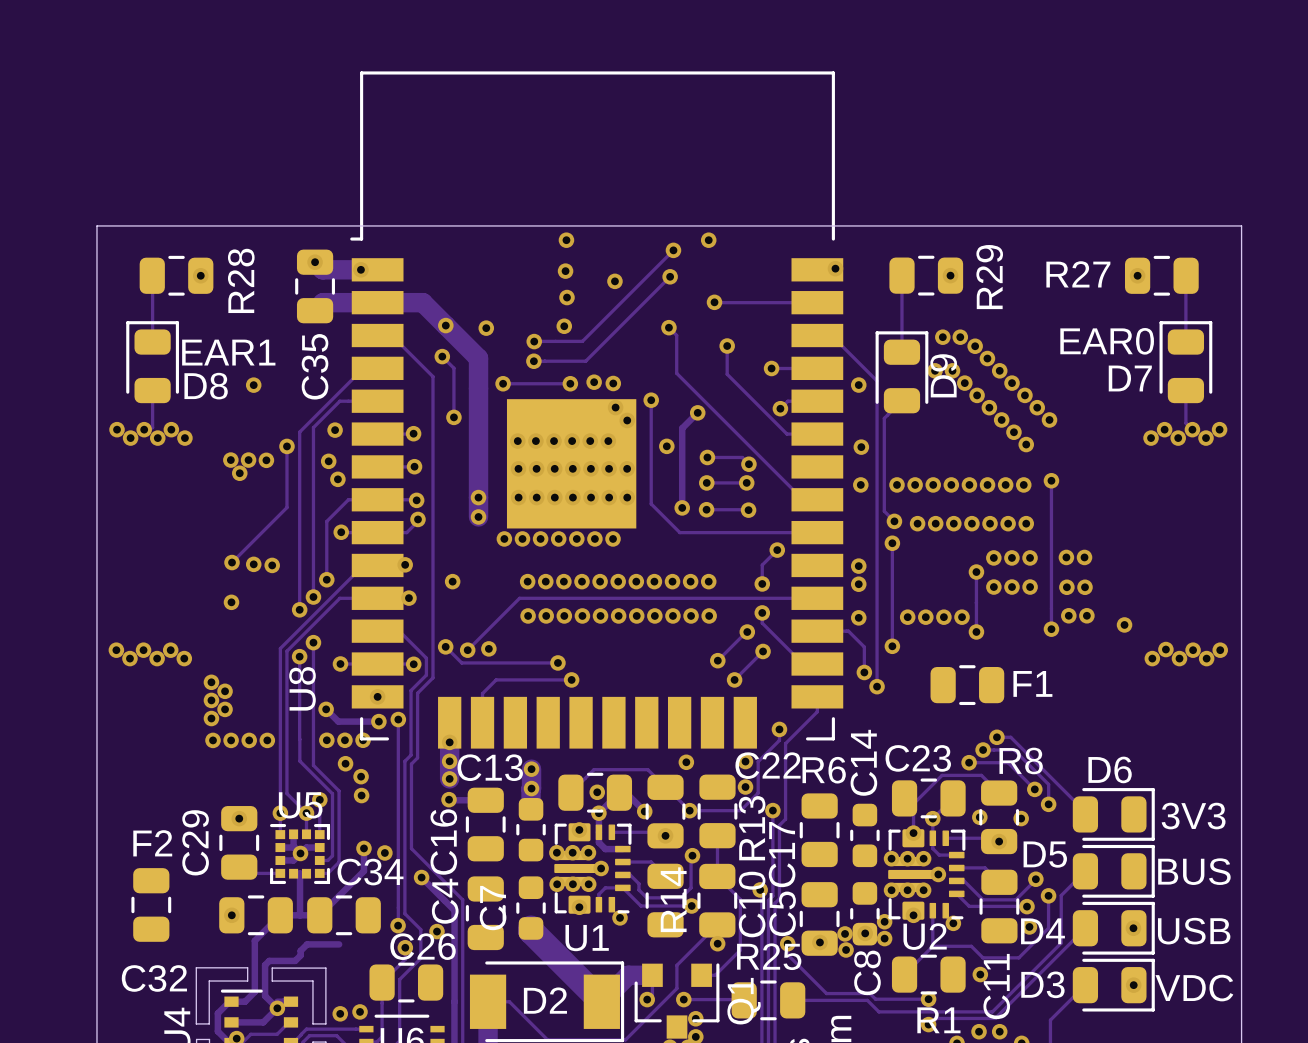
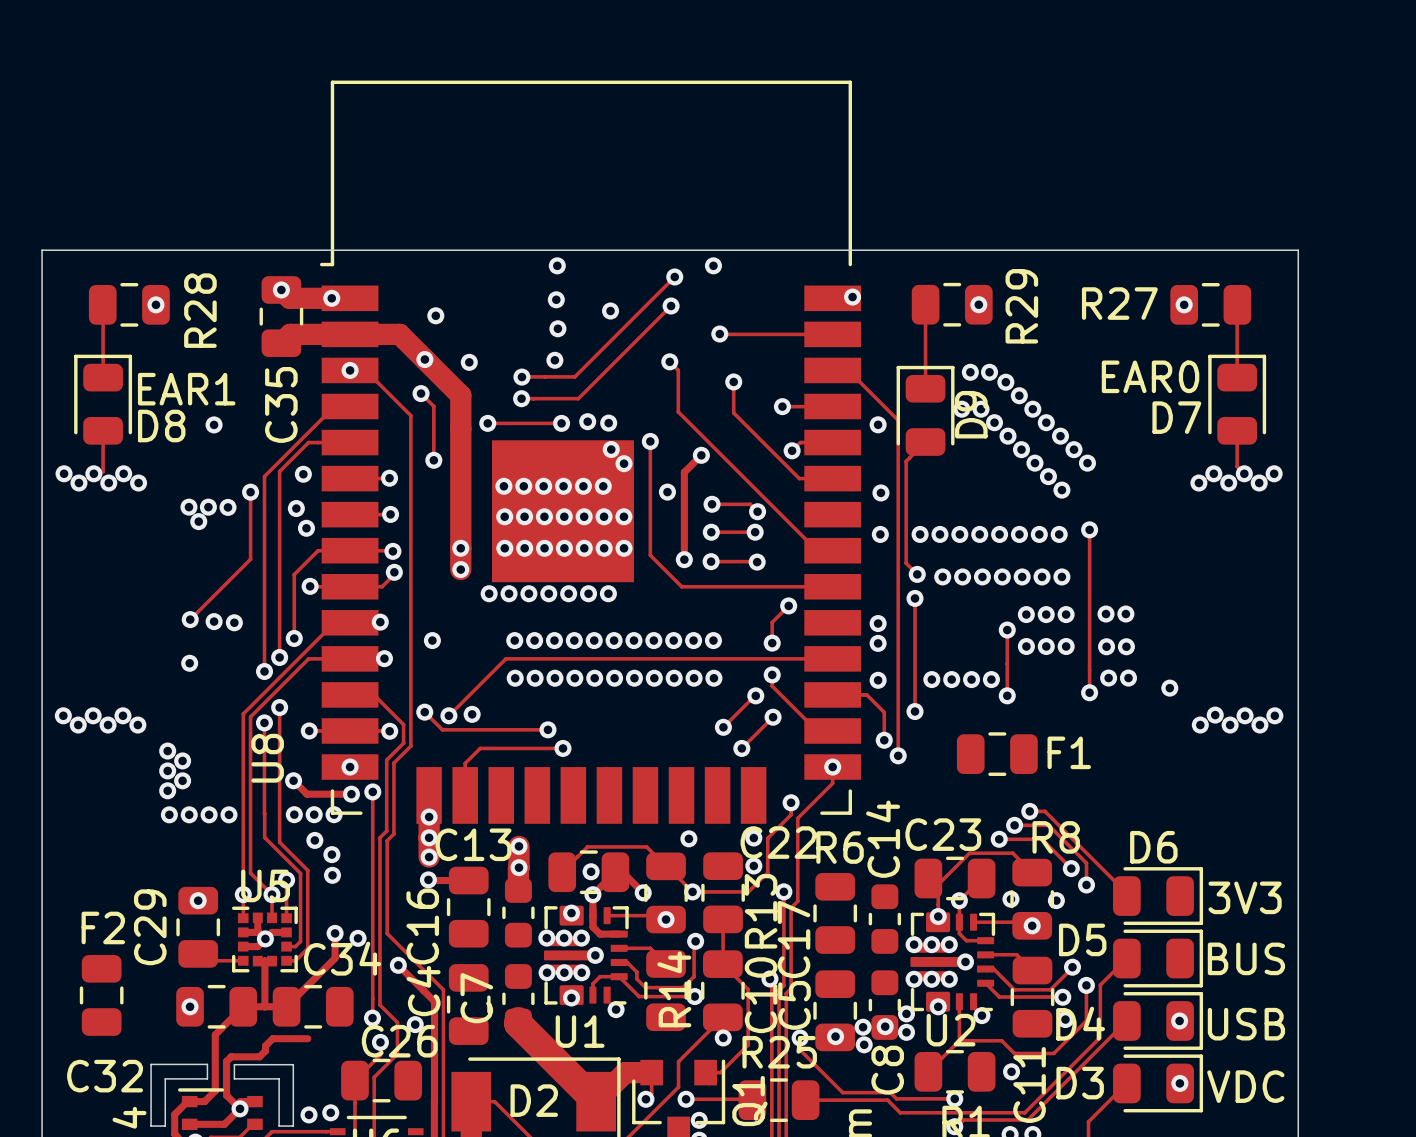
via: none -> (435, 315)
via: none -> (350, 370)
via: none -> (832, 767)

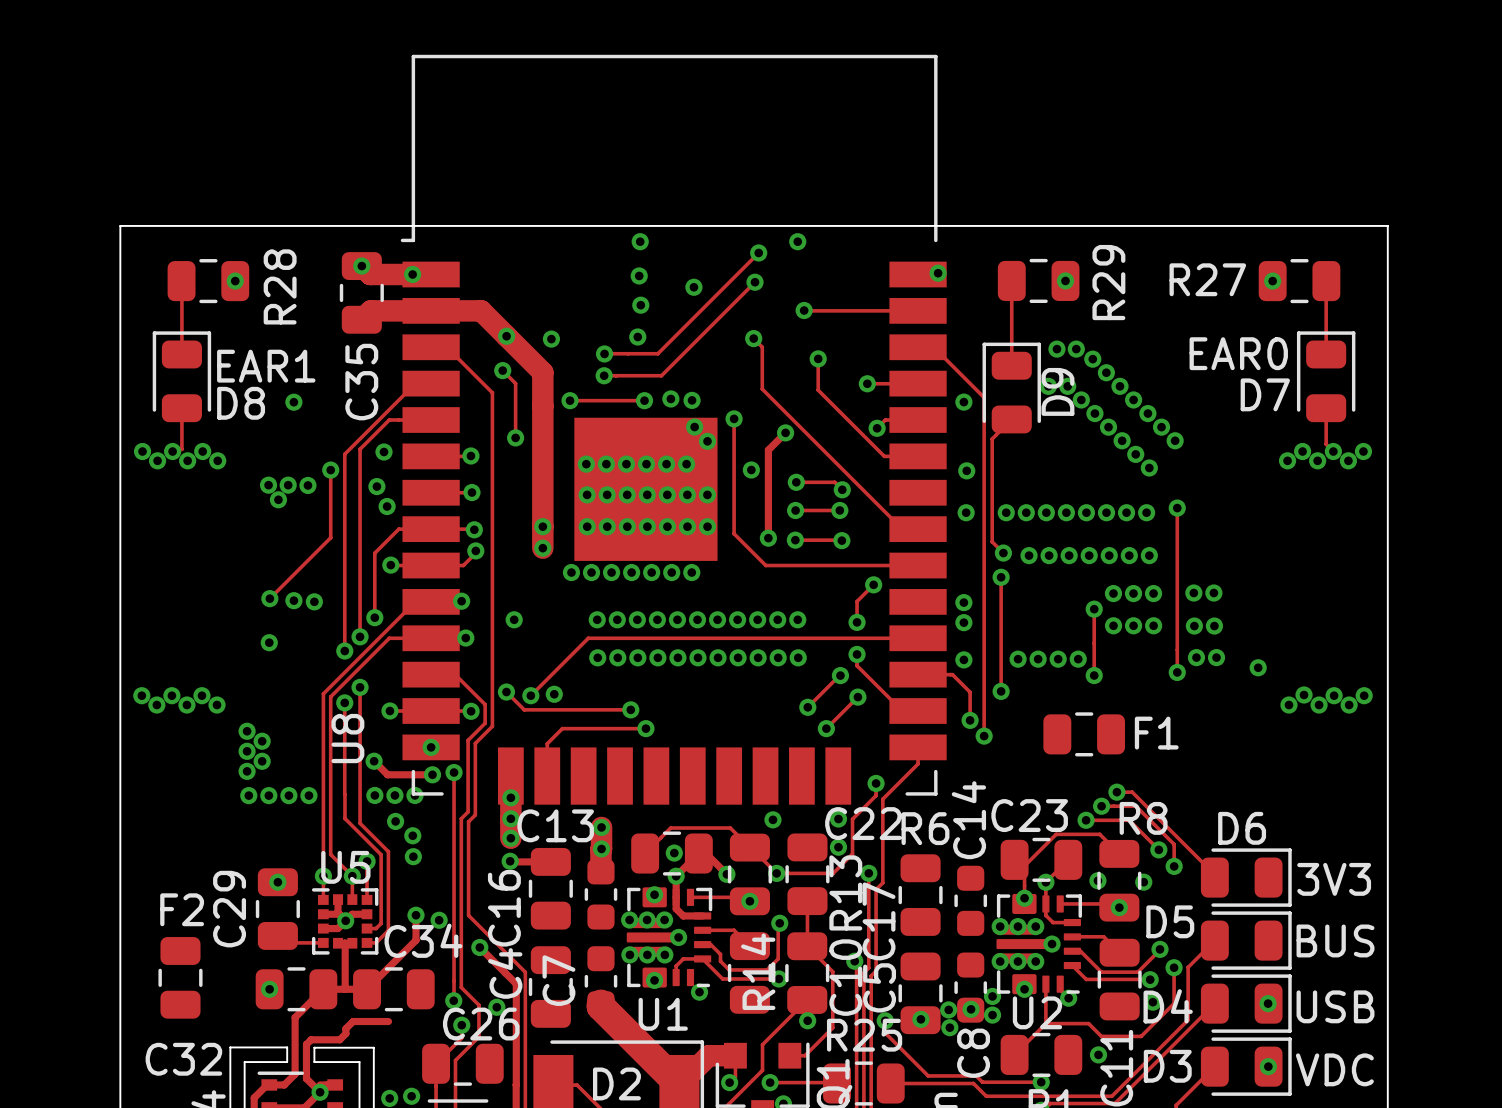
via: (435, 315) -> none
via: (350, 370) -> none
via: (832, 767) -> none

